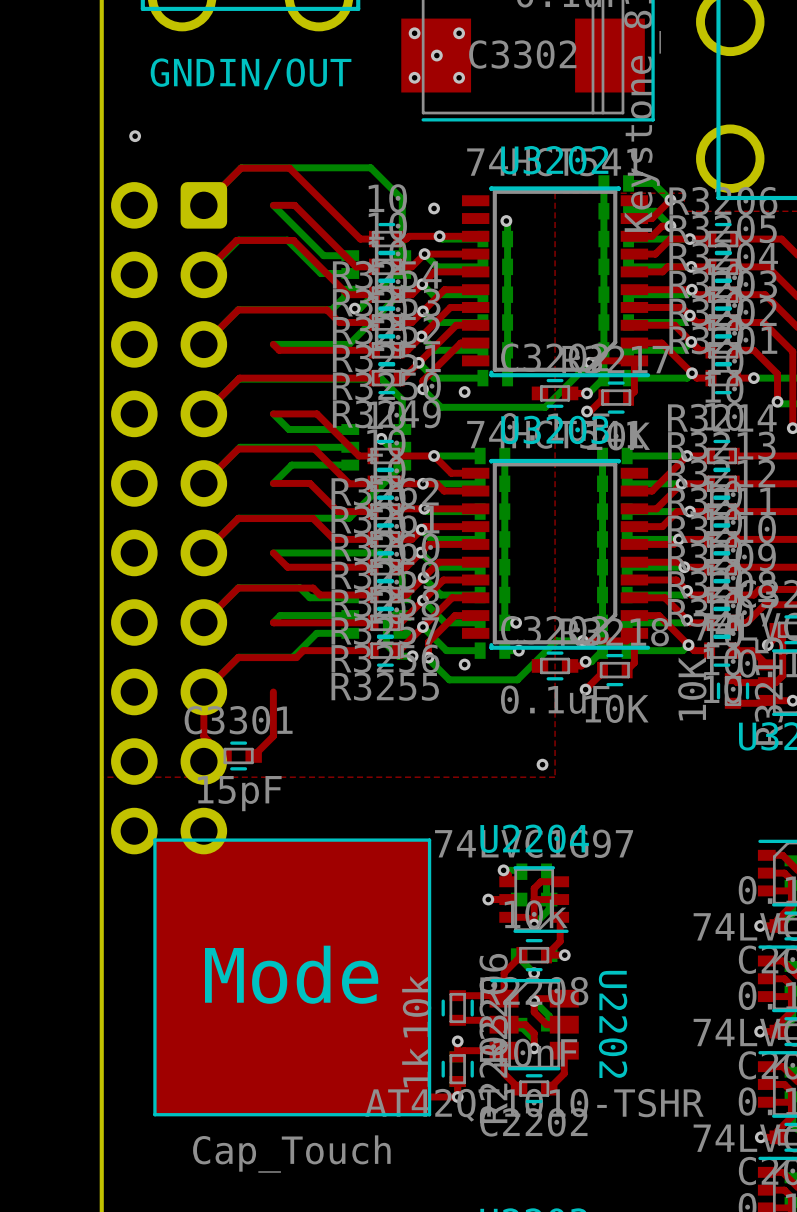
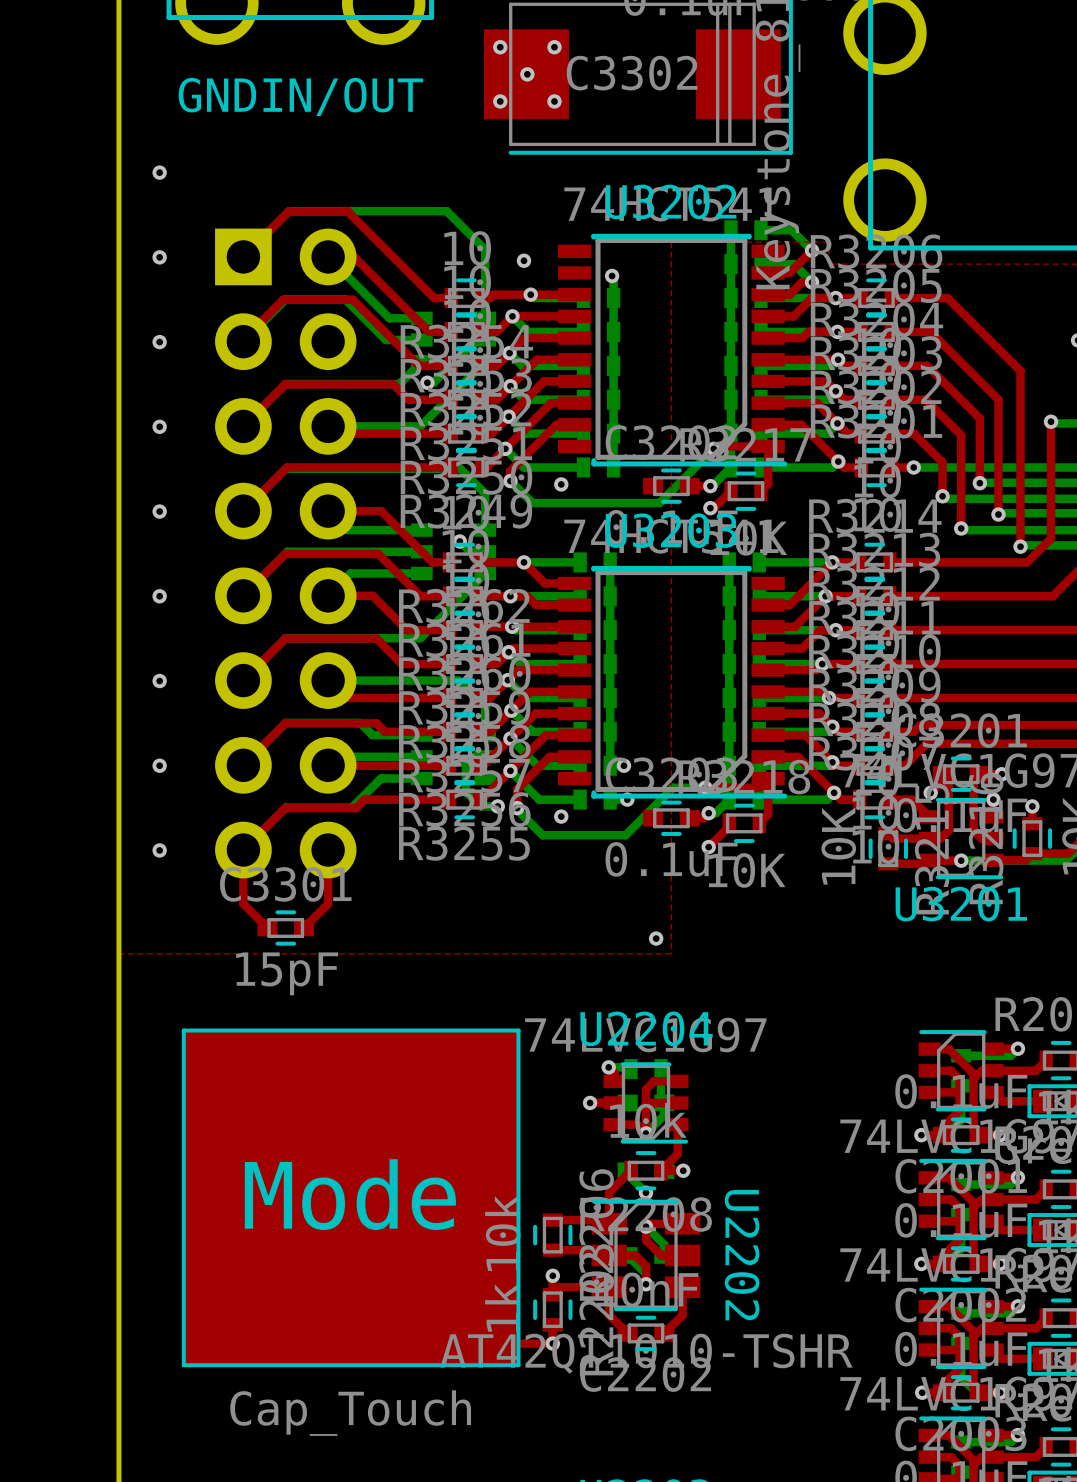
part: none -> (285, 553)
part: (169, 518) -> none

